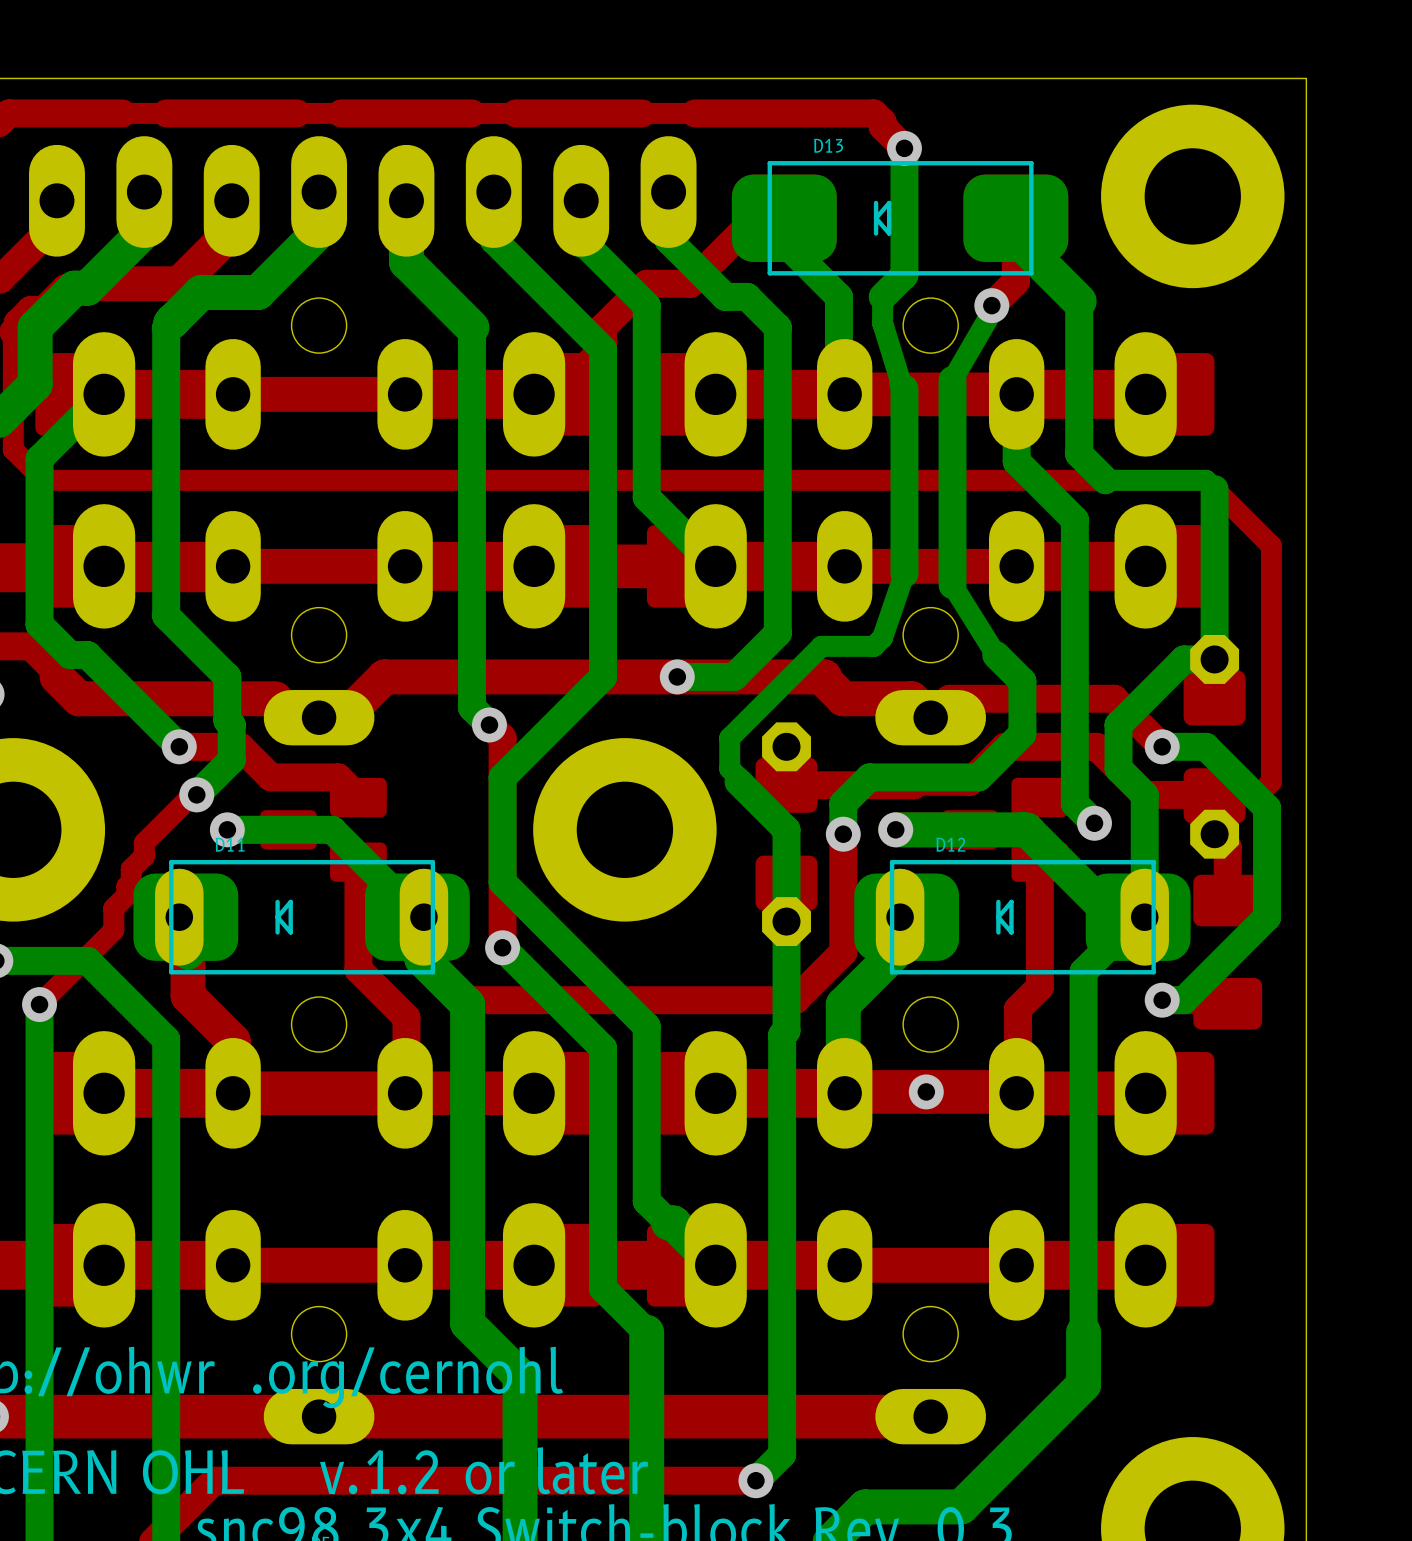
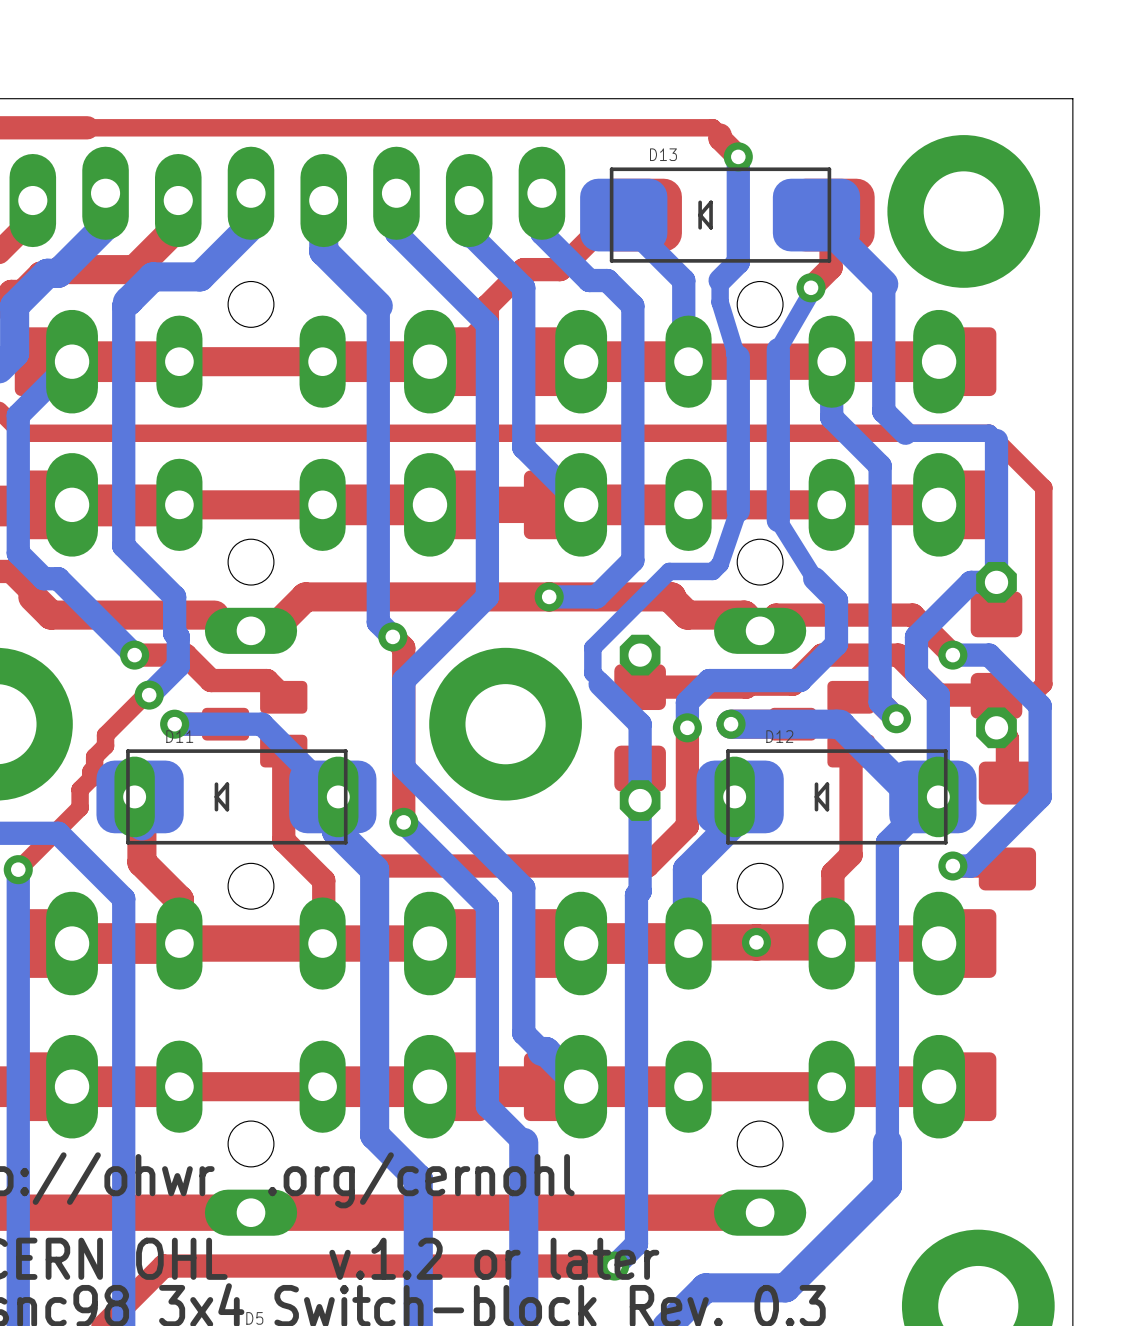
top track width: thick (297, 113) (166, 113) -> thin (232, 127) (123, 127)
top track width: thick (471, 113) (340, 113) -> thin (378, 127) (269, 127)
top track width: thick (642, 113) (515, 113) -> thin (520, 127) (414, 127)
top track width: thick (694, 113) (873, 113) (882, 122) -> thin (563, 127) (712, 127) (720, 135)
part position: (1192, 196) -> (963, 211)
D13 position: (900, 218) -> (720, 215)

